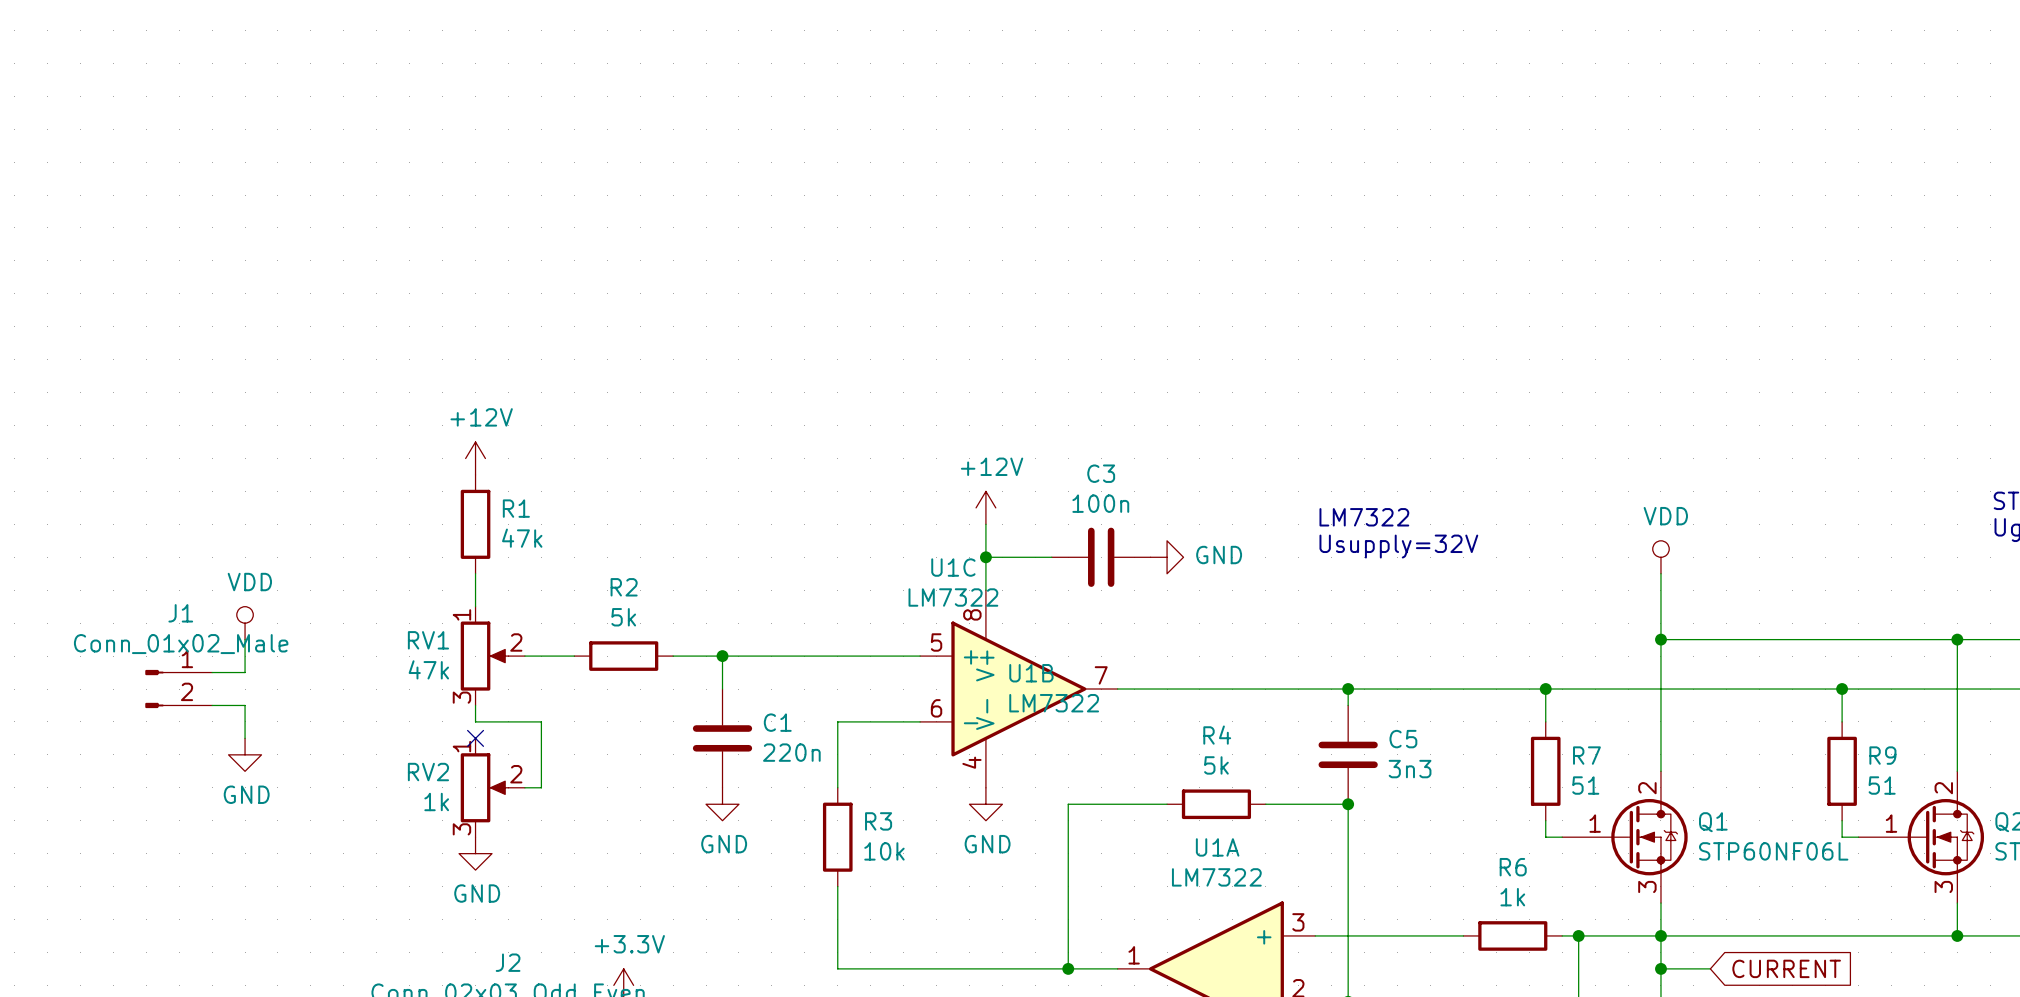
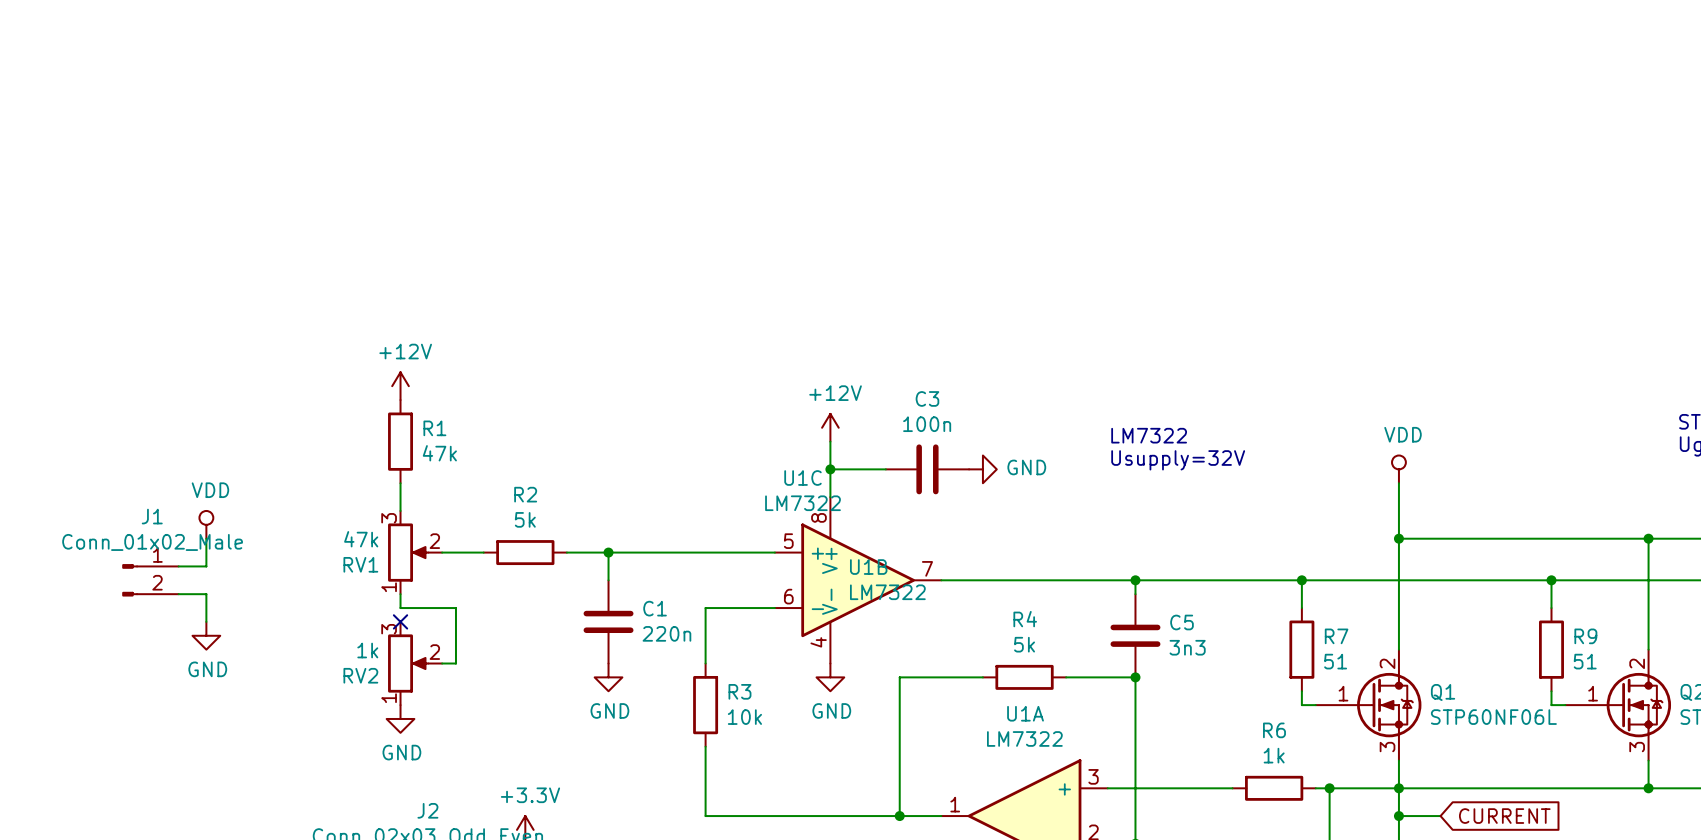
RV1 flip: as is (484, 656) -> up-down (408, 552)
RV2 flip: as is (484, 787) -> up-down (408, 663)

